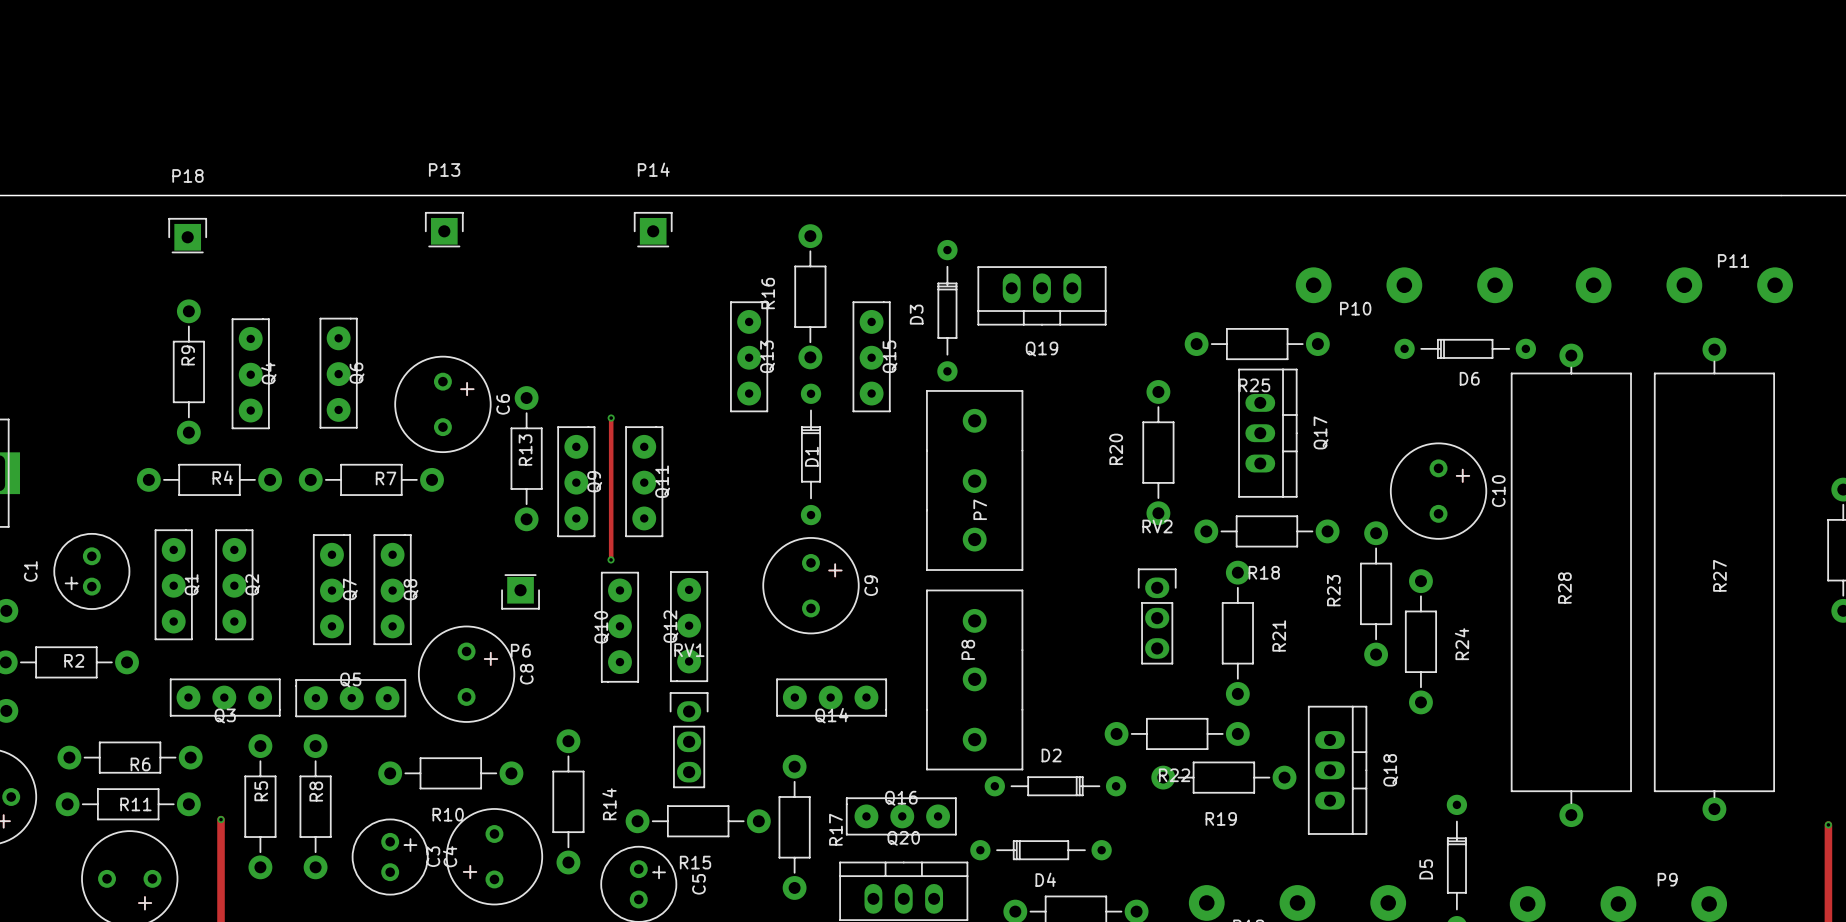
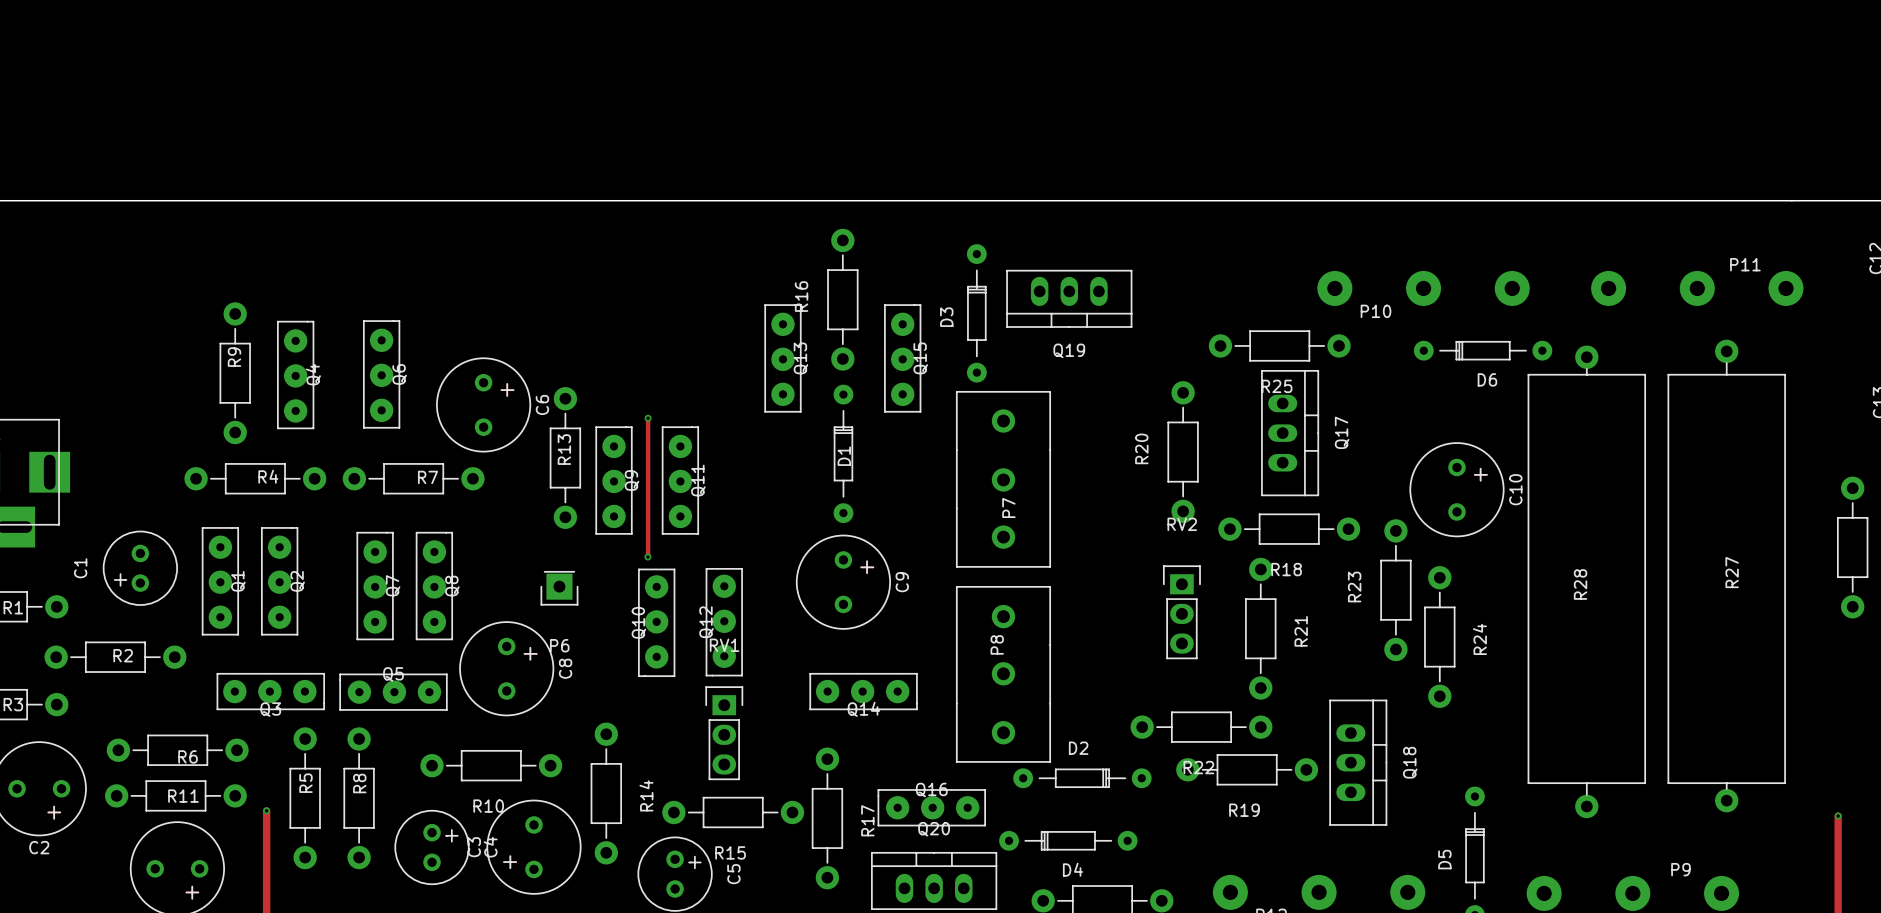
P13: (444, 229) -> none
P14: (653, 229) -> none
P18: (187, 235) -> none
RV2 footprint: [1137, 568, 1177, 665] -> [1162, 565, 1201, 660]
RV1 footprint: [669, 692, 709, 789] -> [705, 686, 744, 781]

